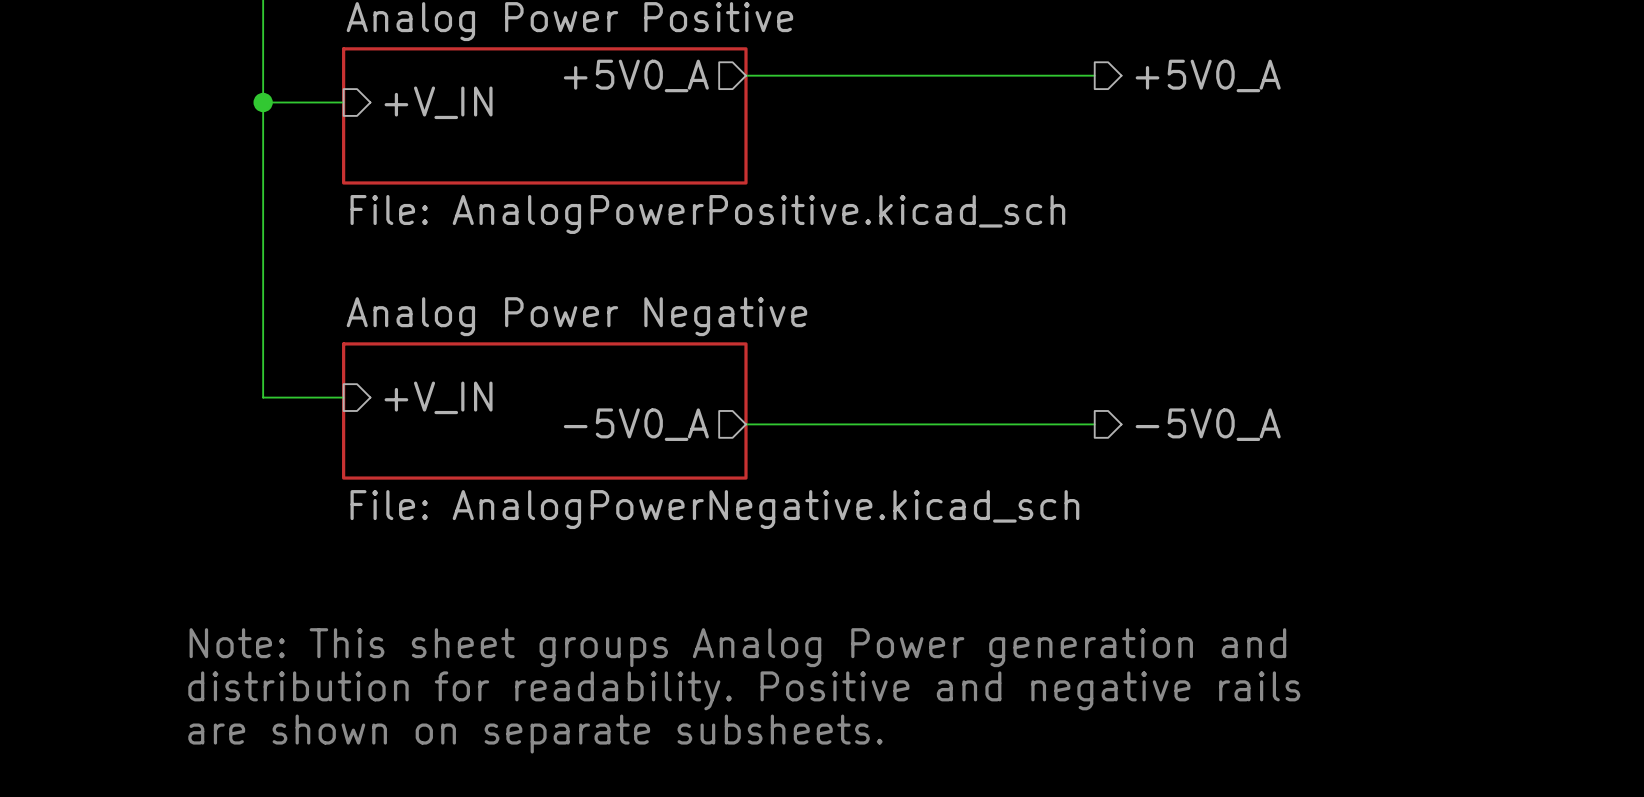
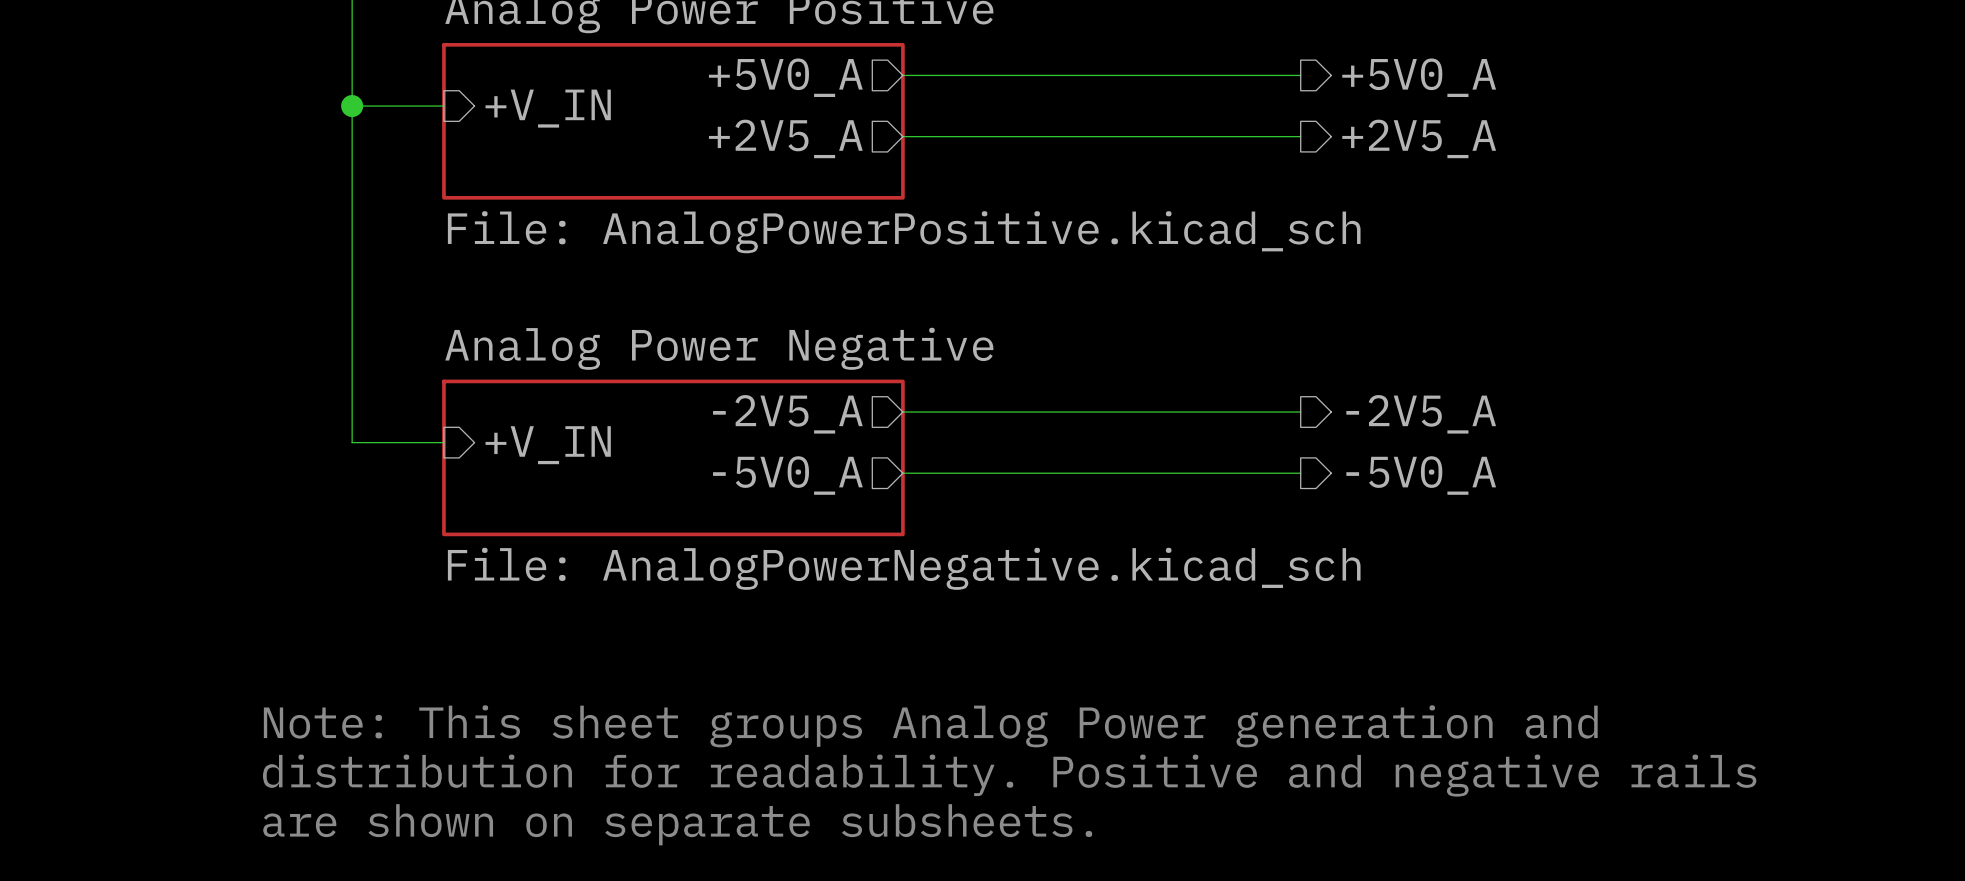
sheet pin: none -> +2V5_A (785, 138)
wire: none -> (902, 136) (1300, 136)
hierarchical label: none -> +2V5_A (1419, 138)
wire: none -> (902, 412) (1300, 412)
sheet pin: none -> -2V5_A (787, 414)
hierarchical label: none -> -2V5_A (1421, 414)

